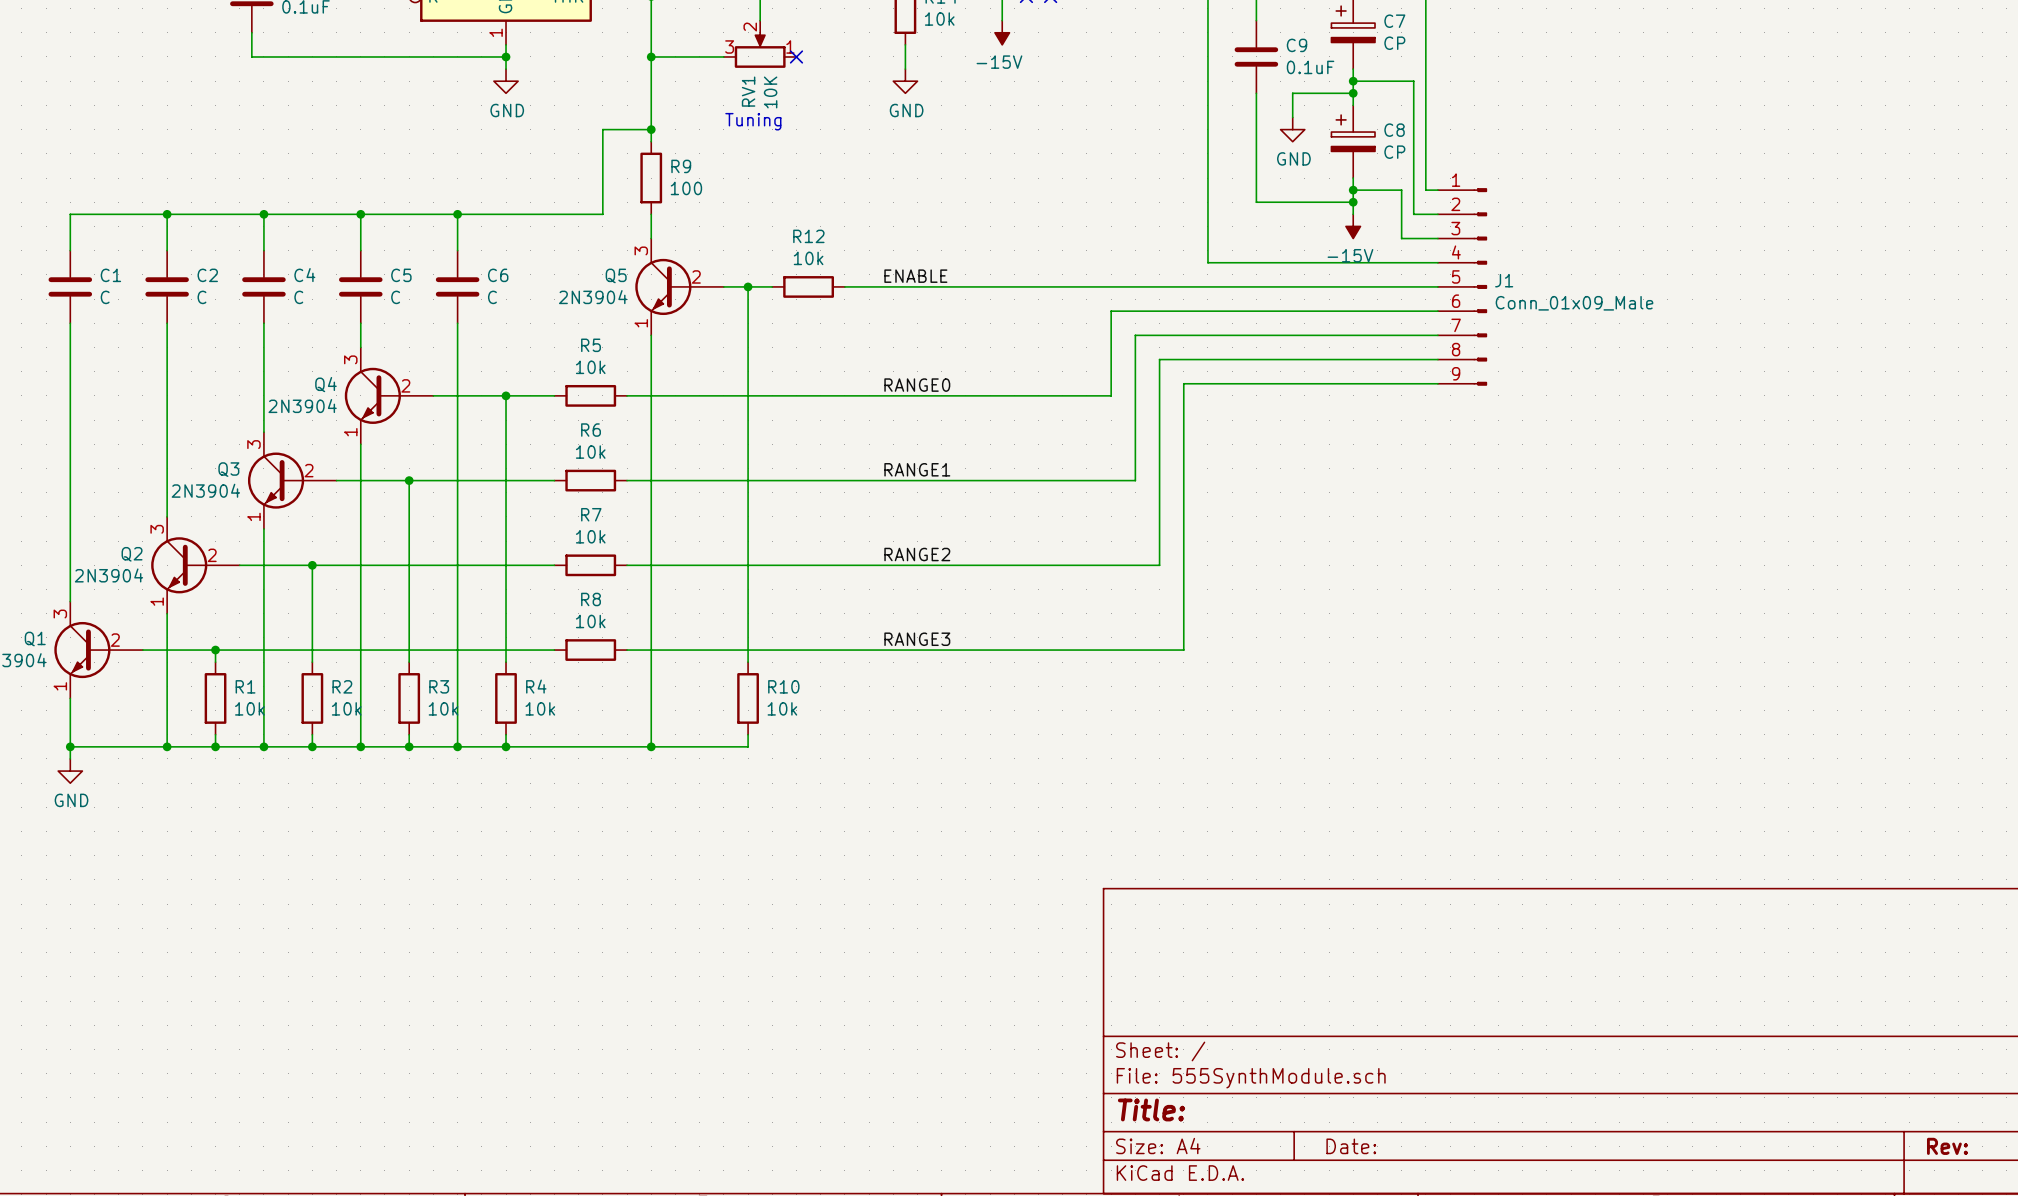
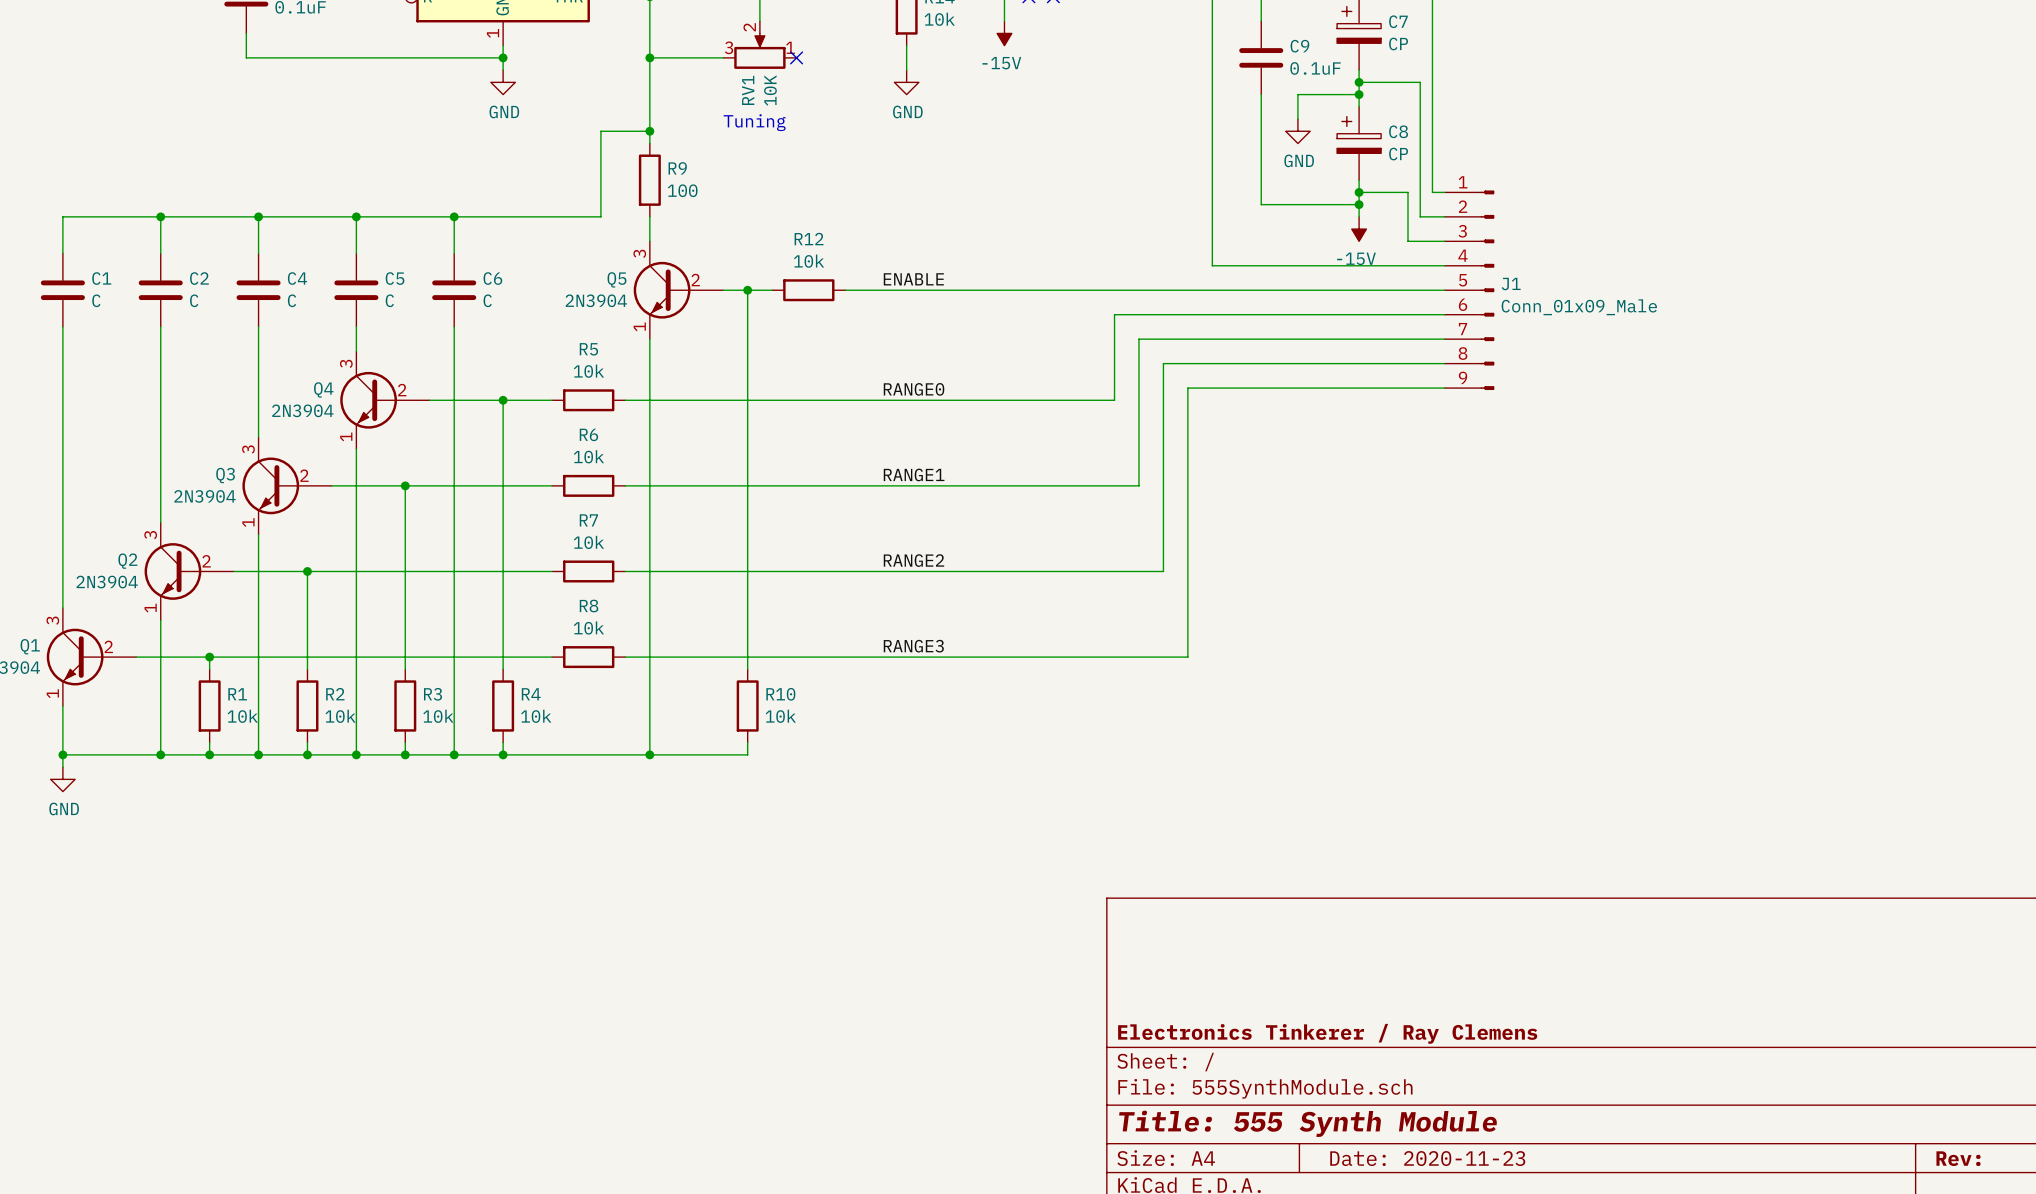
title block: none -> Electronics Tinkerer / Ray Clemens (1327, 1033)
title block: Title: (1151, 1109) -> Title: 555 Synth Module (1308, 1123)
title block: Date: (1351, 1146) -> Date: 2020-11-23 (1427, 1158)

